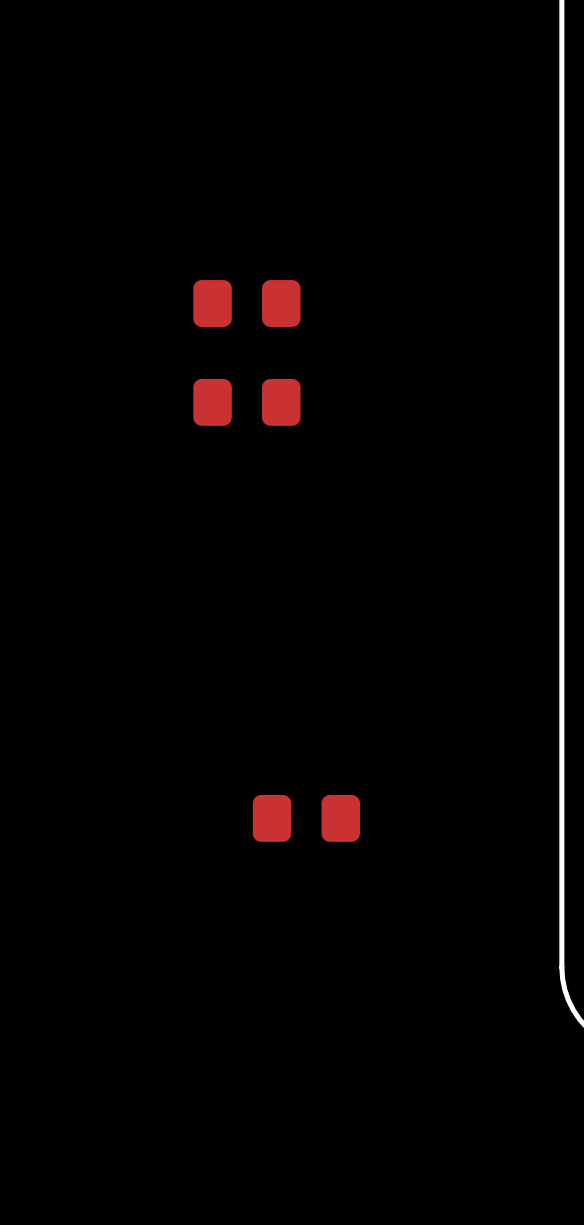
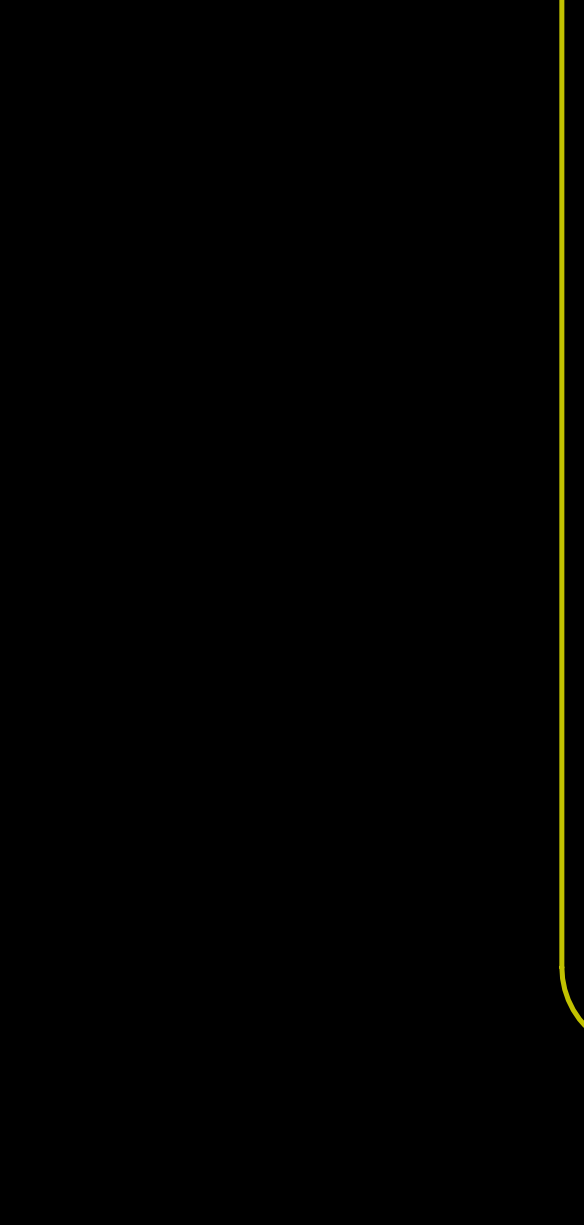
part: (246, 303) -> none
part: (246, 402) -> none
part: (306, 818) -> none

